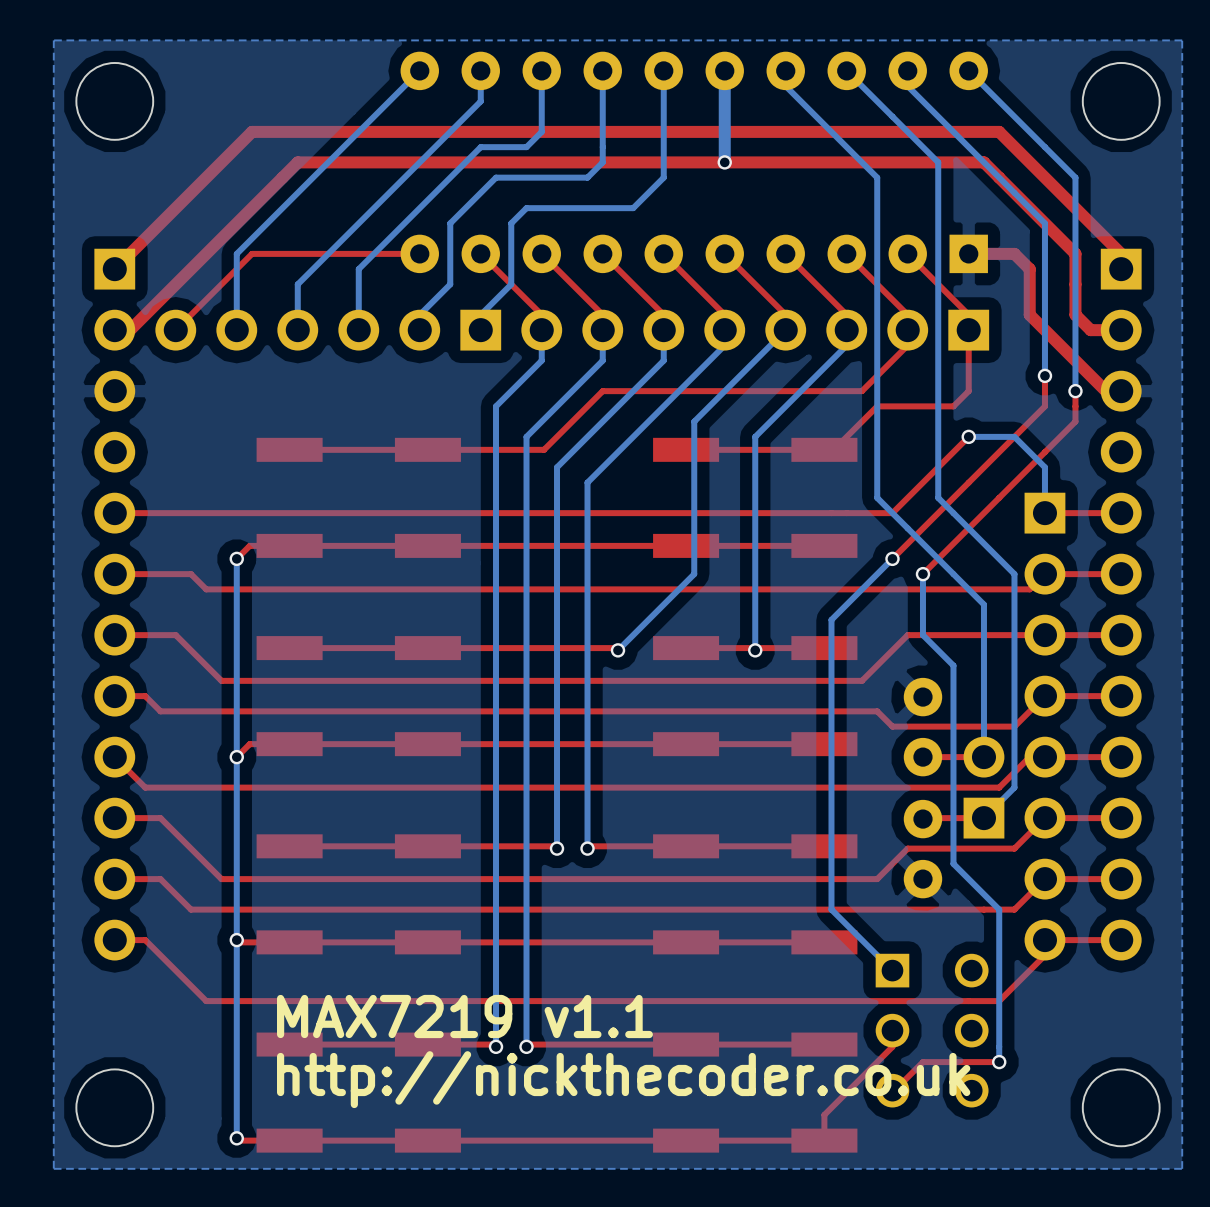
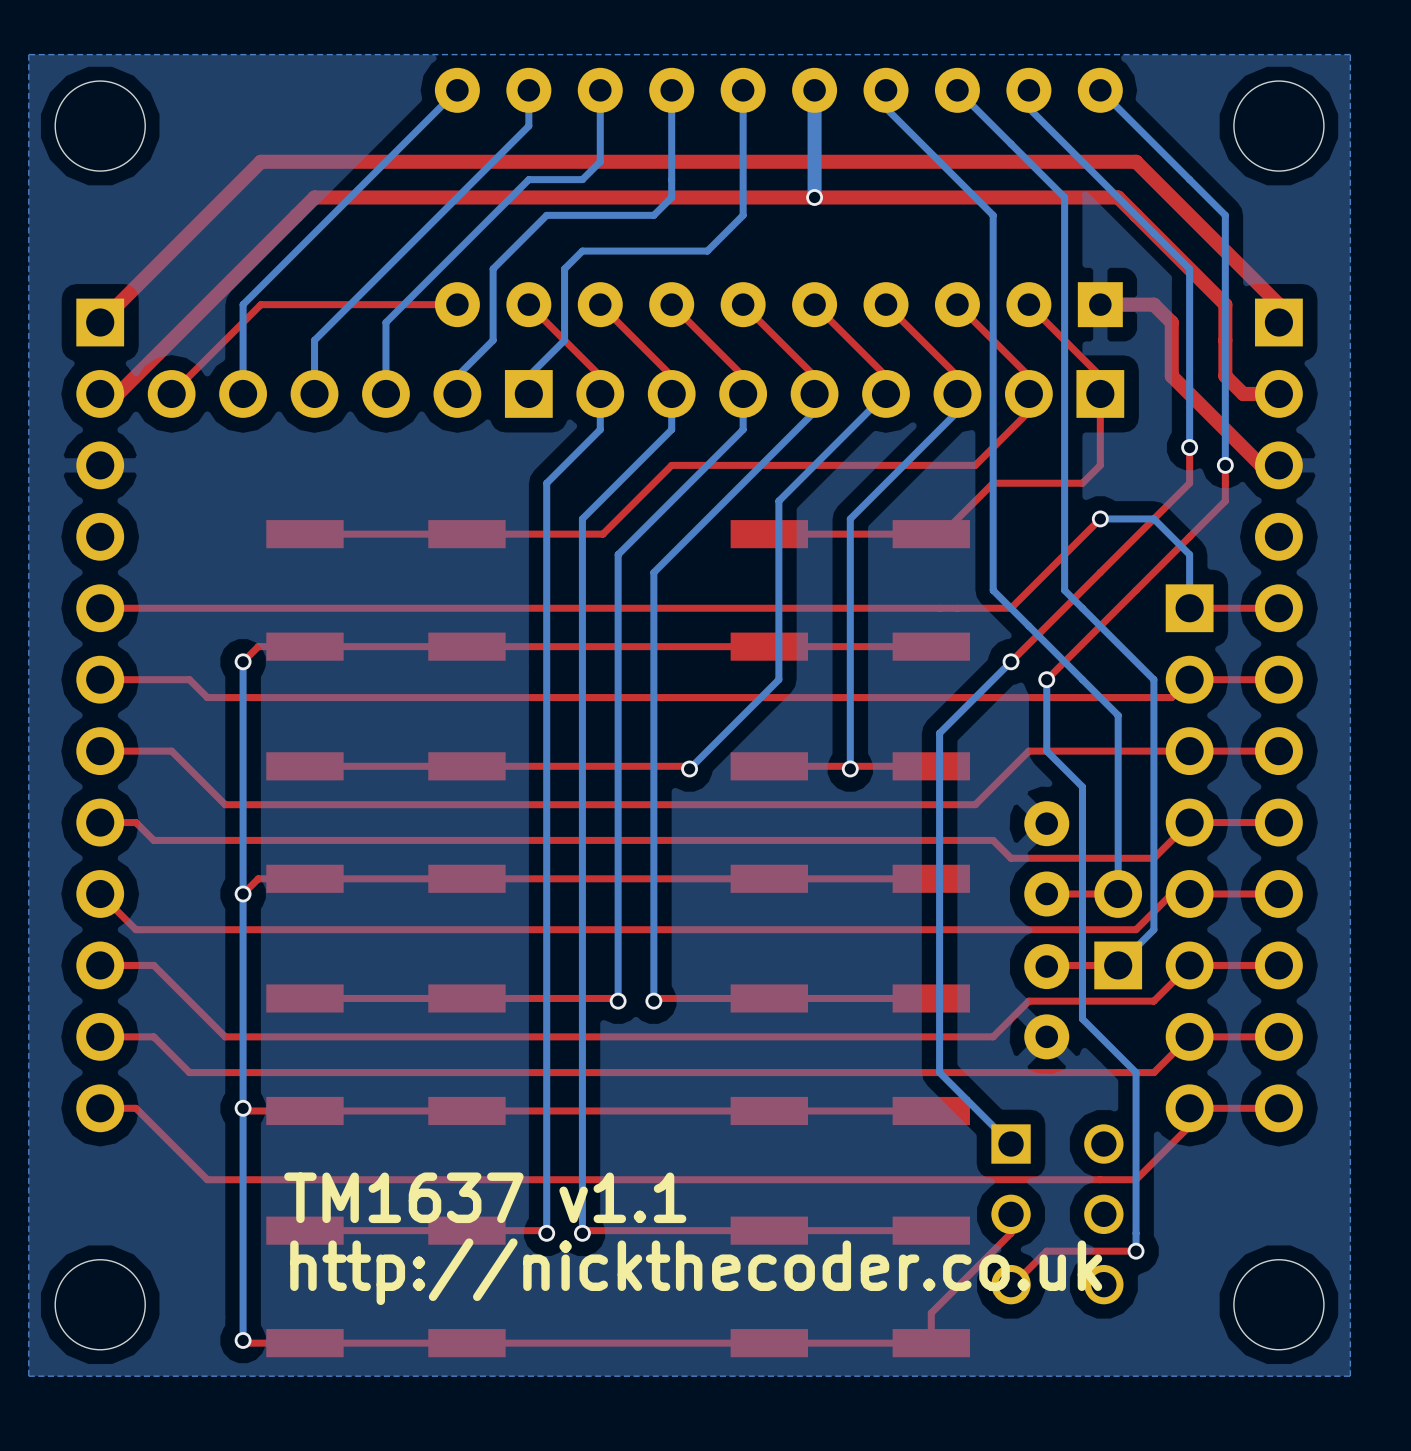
text: MAX7219 v1.1 (464, 1016) -> TM1637 v1.1 (485, 1197)

